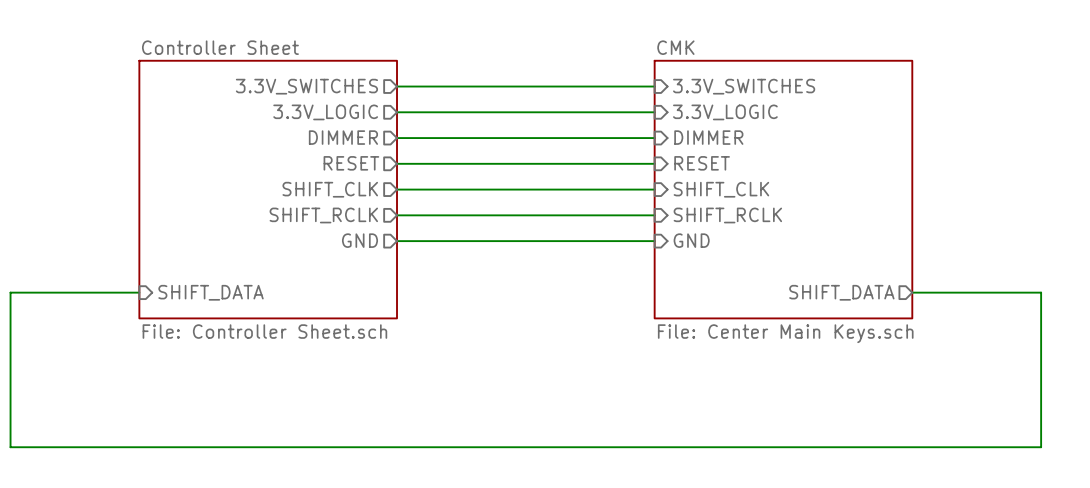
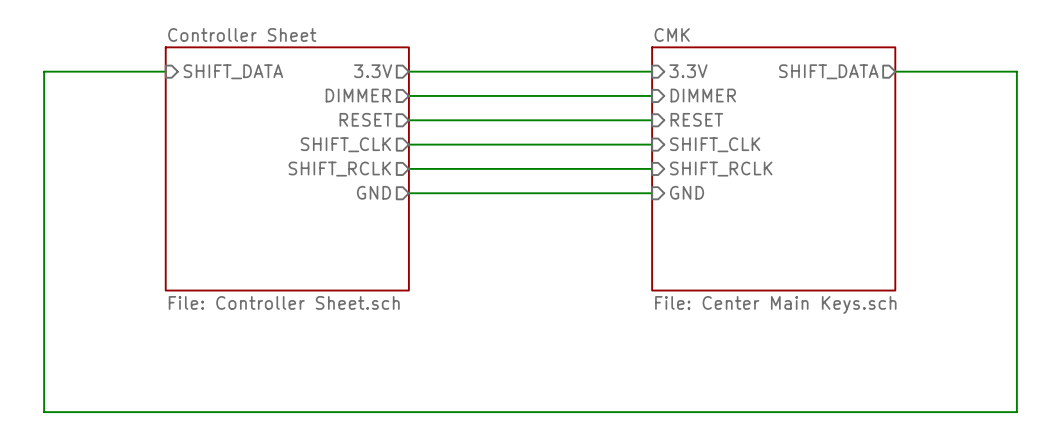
sheet pin: 3.3V_SWITCHES (306, 86) -> 3.3V (373, 71)
sheet pin: 3.3V_SWITCHES (744, 86) -> 3.3V (688, 71)
sheet pin: 3.3V_LOGIC (325, 112) -> DIMMER (358, 95)
sheet pin: 3.3V_LOGIC (725, 112) -> DIMMER (703, 95)
sheet pin: DIMMER (343, 137) -> RESET (365, 119)
sheet pin: DIMMER (708, 137) -> RESET (696, 119)
sheet pin: RESET (351, 163) -> SHIFT_CLK (345, 144)
sheet pin: RESET (702, 163) -> SHIFT_CLK (715, 144)
sheet pin: SHIFT_CLK (330, 189) -> SHIFT_RCLK (339, 169)
sheet pin: SHIFT_CLK (721, 189) -> SHIFT_RCLK (721, 169)
sheet pin: SHIFT_RCLK (323, 215) -> GND (373, 192)
sheet pin: SHIFT_RCLK (727, 215) -> GND (687, 192)
sheet pin: GND (360, 240) -> none
sheet pin: GND (691, 240) -> none
wire: (397, 241) (654, 241) -> none
wire: (10, 292) (139, 292) -> (44, 266) (44, 71) (165, 71)
sheet pin position: SHIFT_DATA (211, 292) -> SHIFT_DATA (233, 71)
sheet pin position: SHIFT_DATA (841, 292) -> SHIFT_DATA (828, 71)
wire: (912, 292) (1041, 292) -> (895, 71) (1016, 71) (1016, 266)

